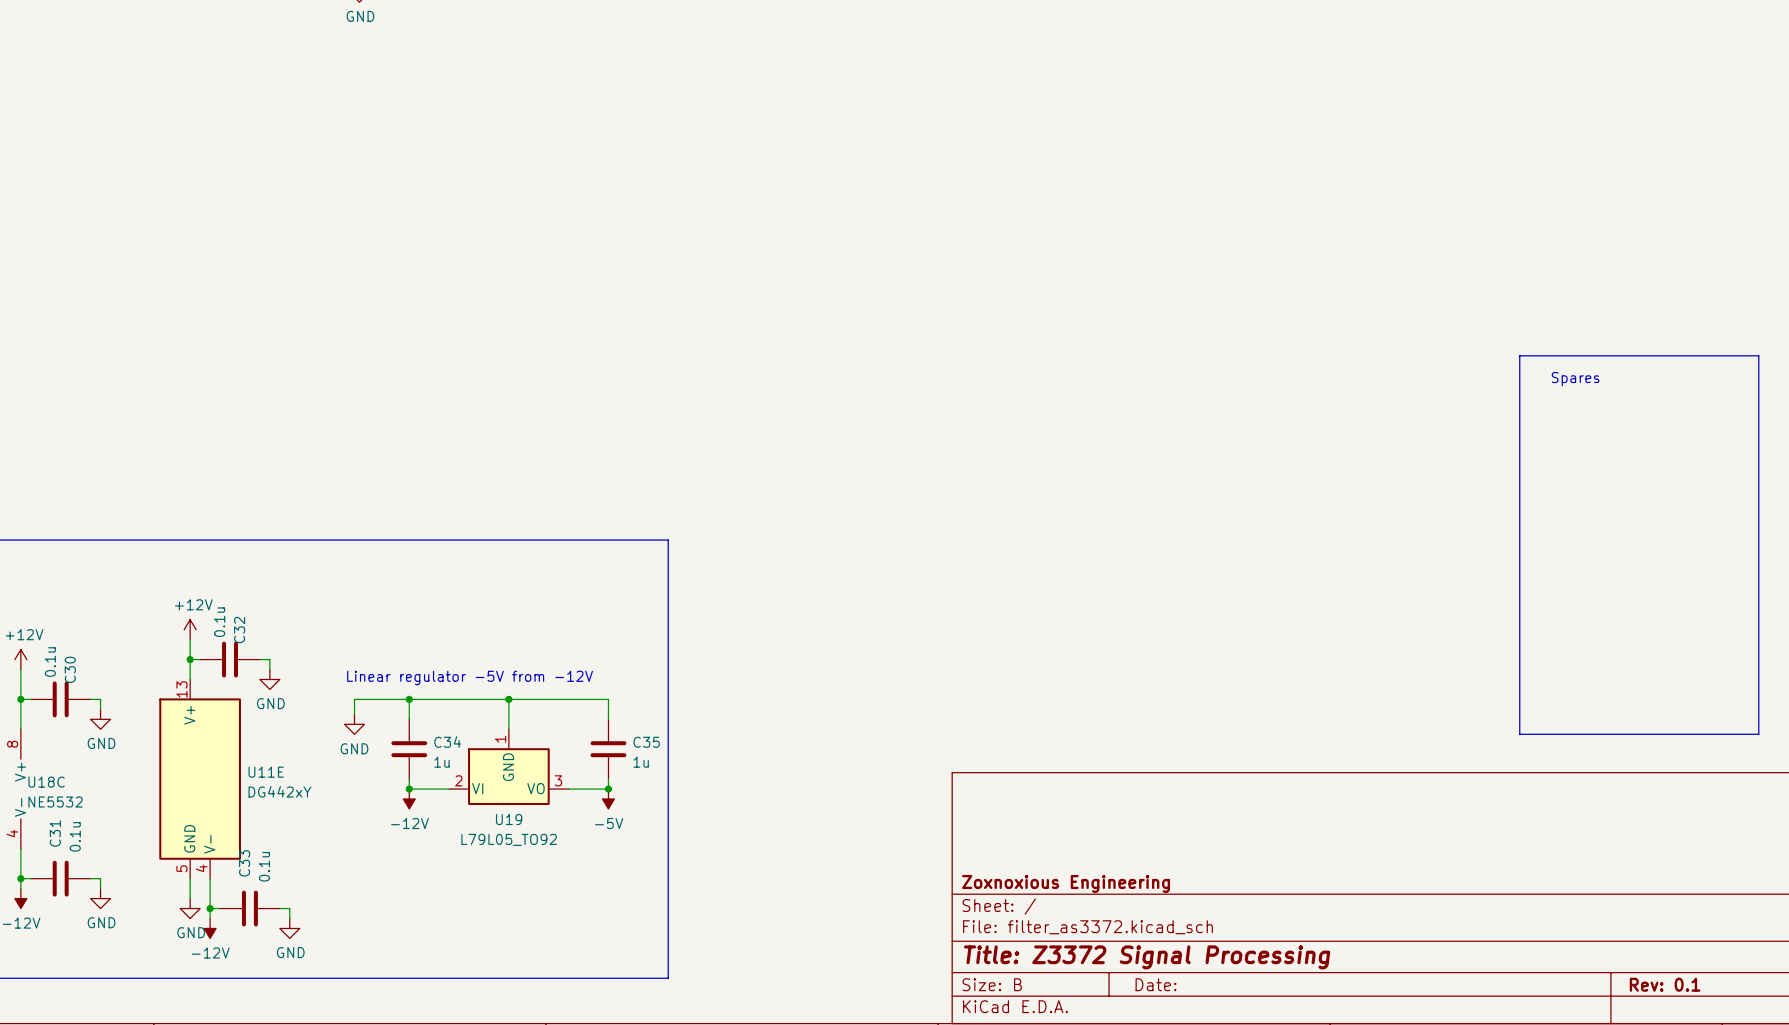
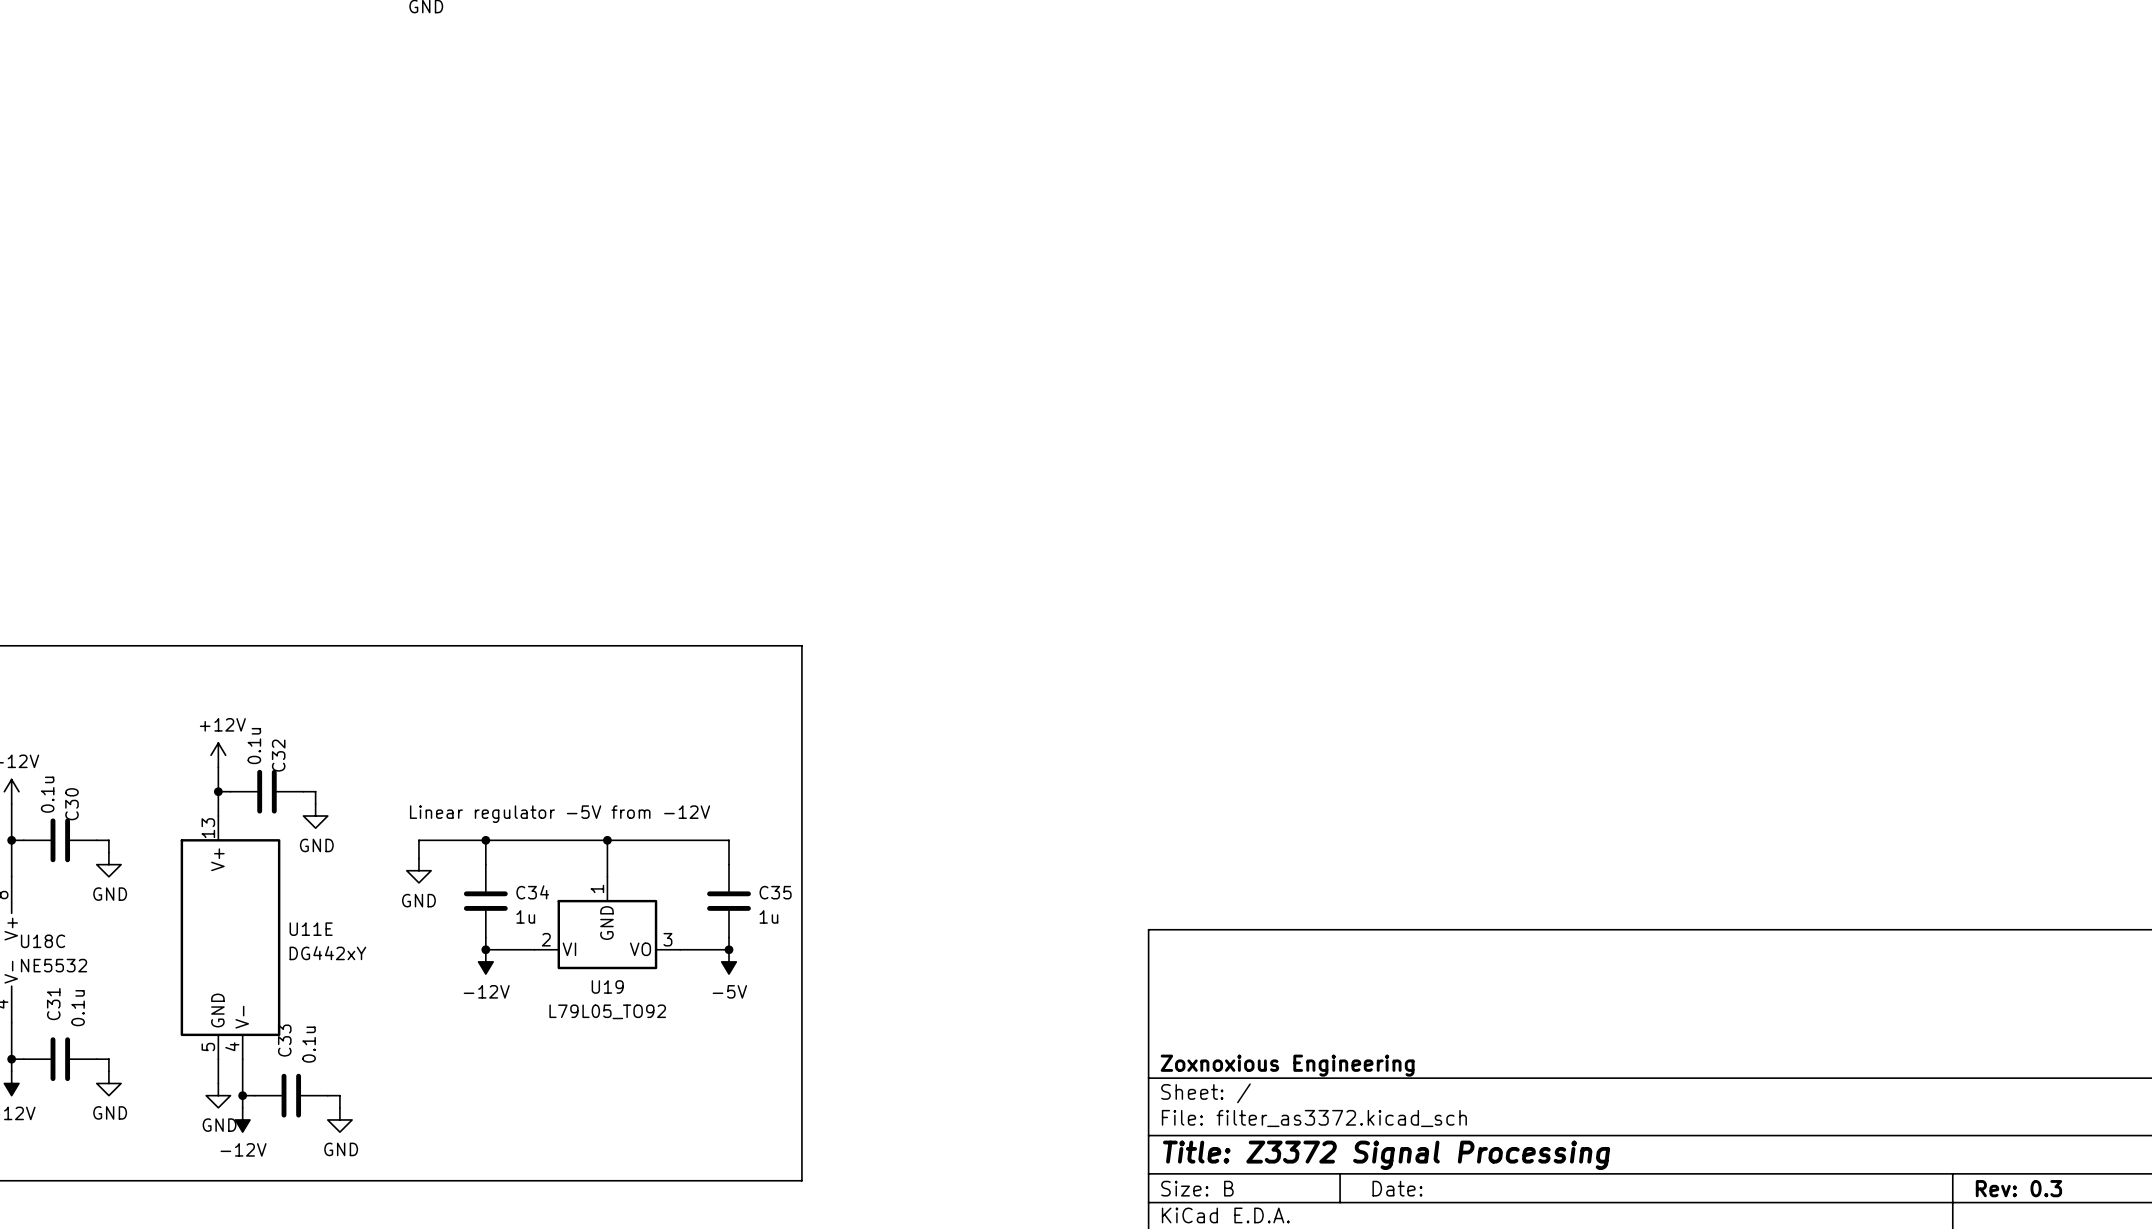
line: (1519, 355) (1758, 355) (1758, 734) (1519, 734) (1519, 355) -> none
text: Spares (1575, 379) -> none
title block: Rev: 0.1 (1665, 984) -> Rev: 0.3 (2018, 1188)

